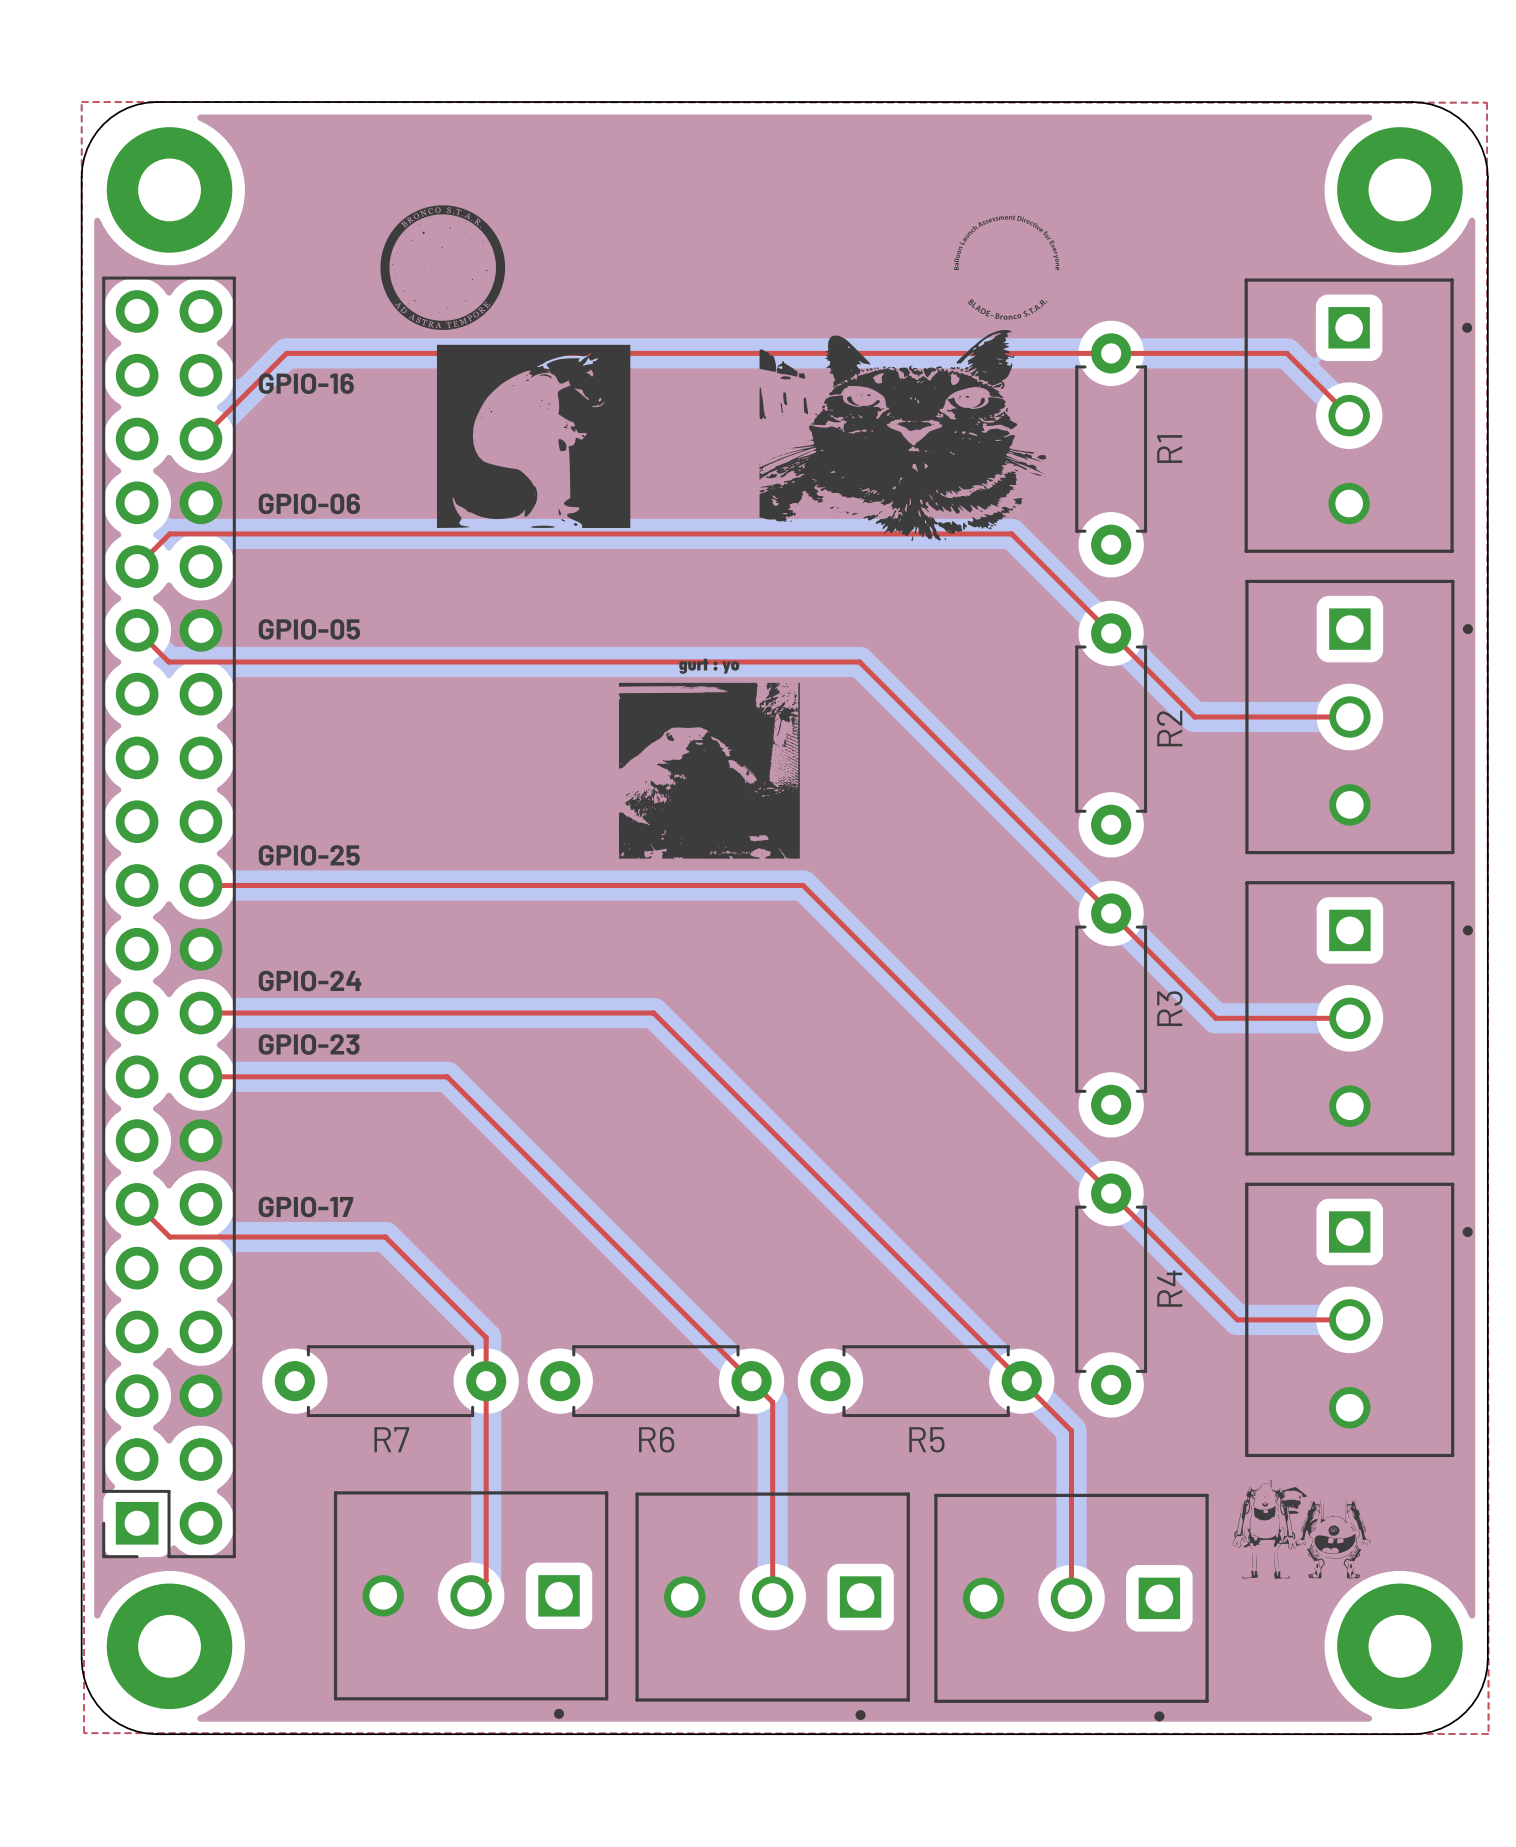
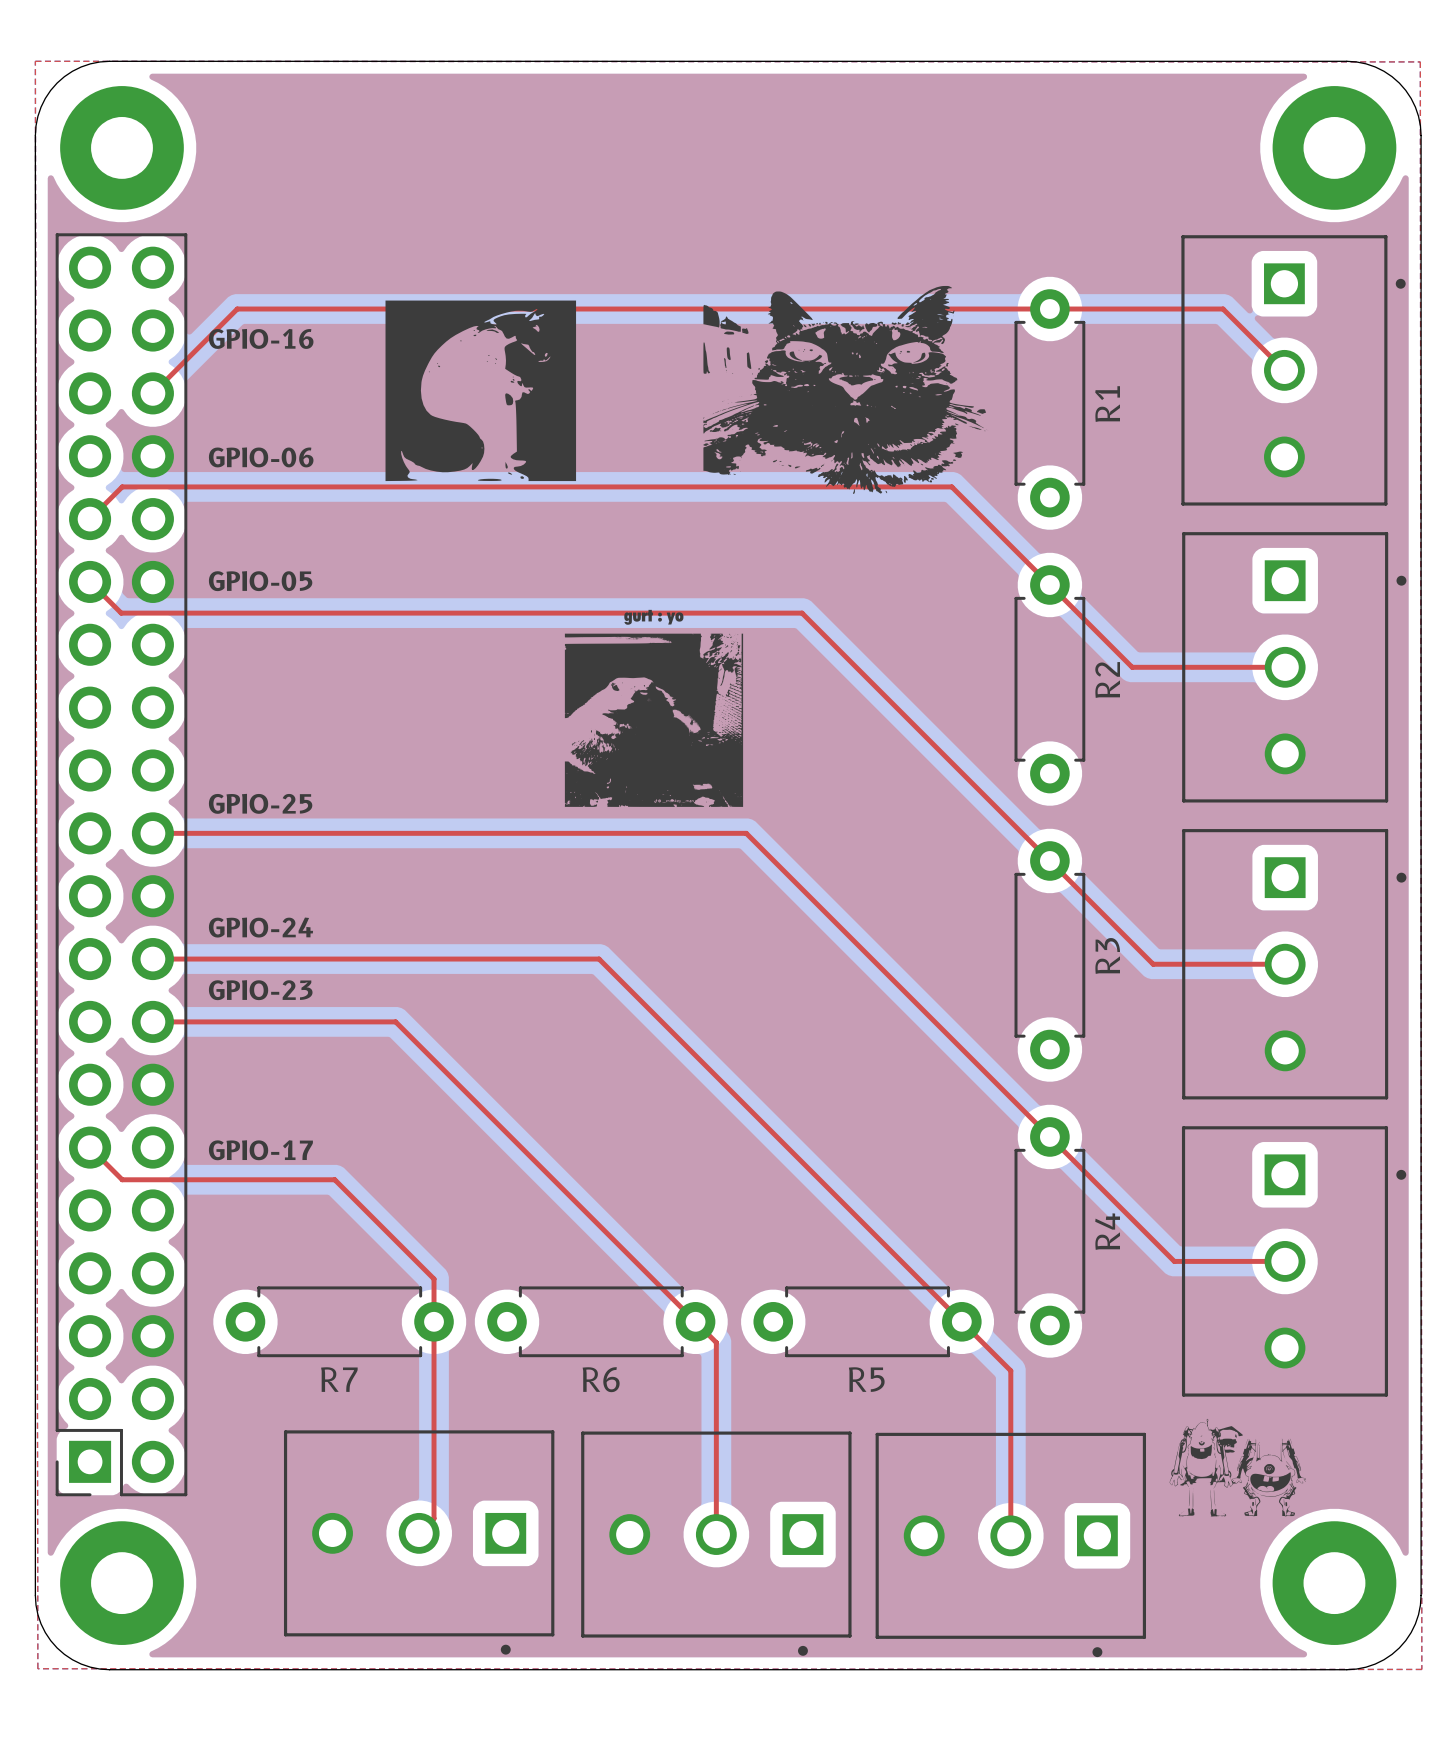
drawing: [380, 205, 506, 330] -> none
drawing: [953, 215, 1060, 320] -> none

